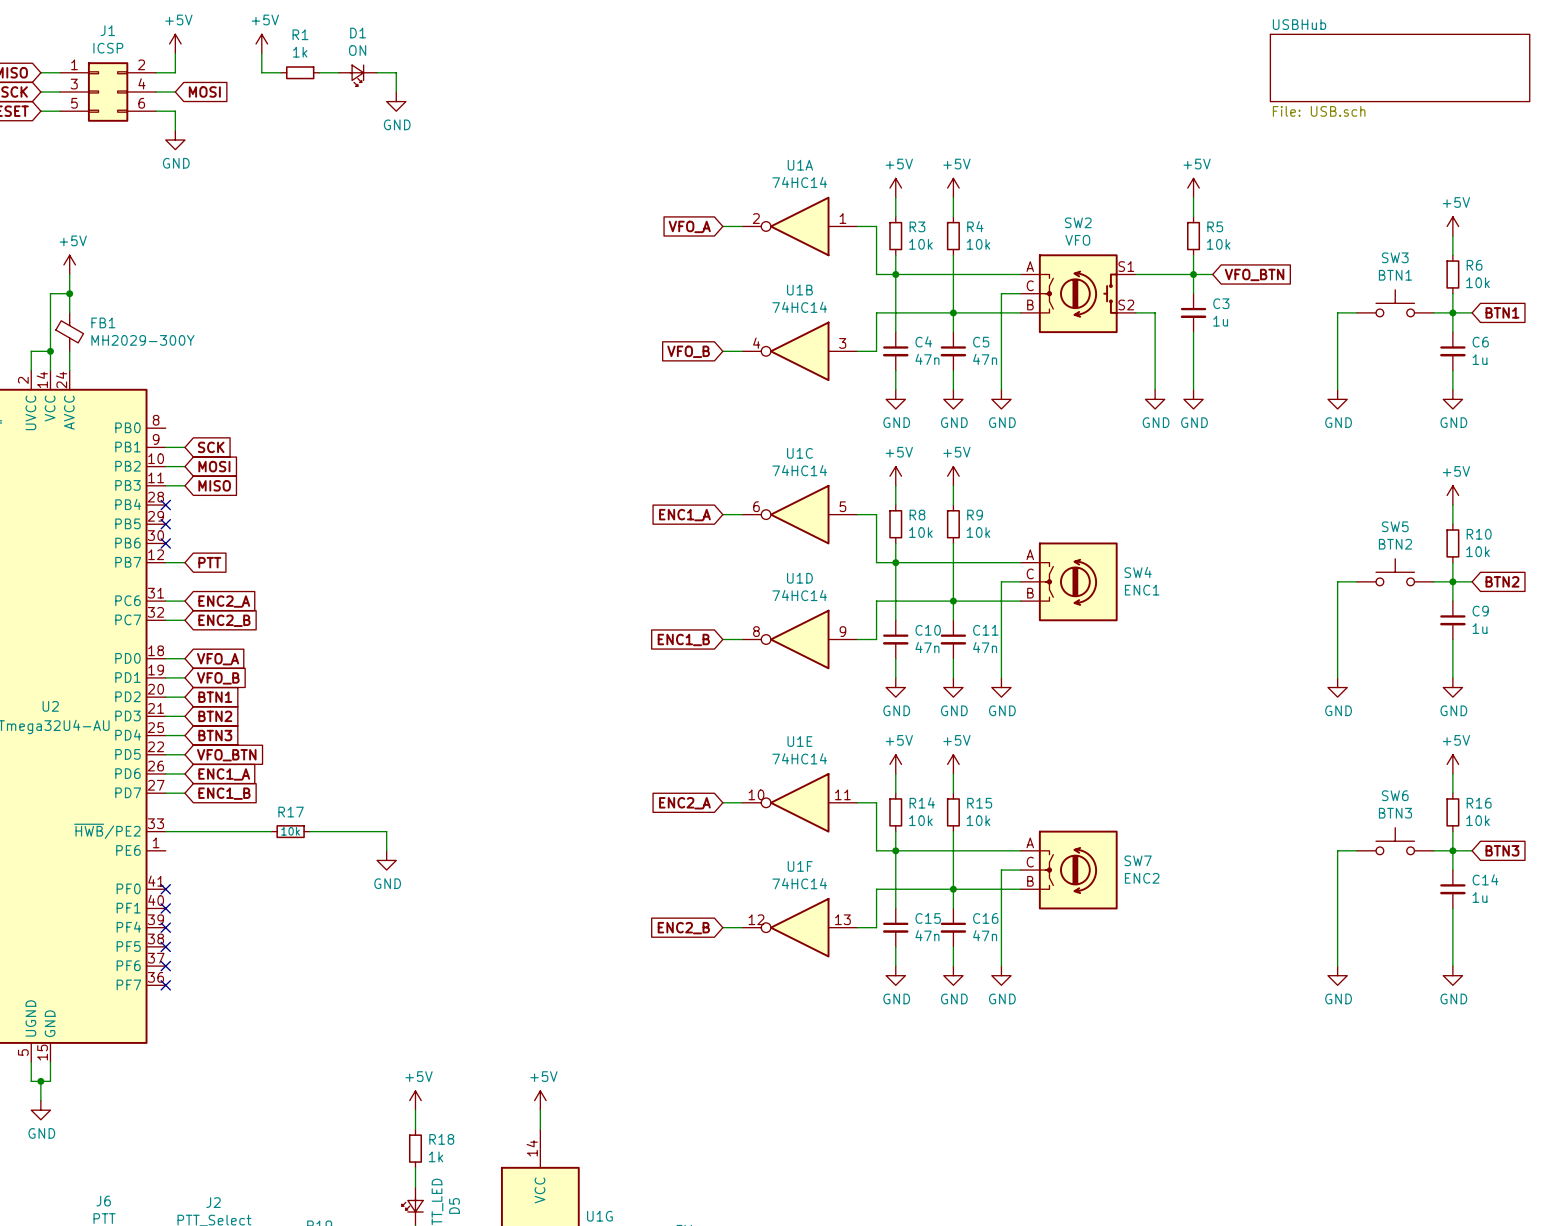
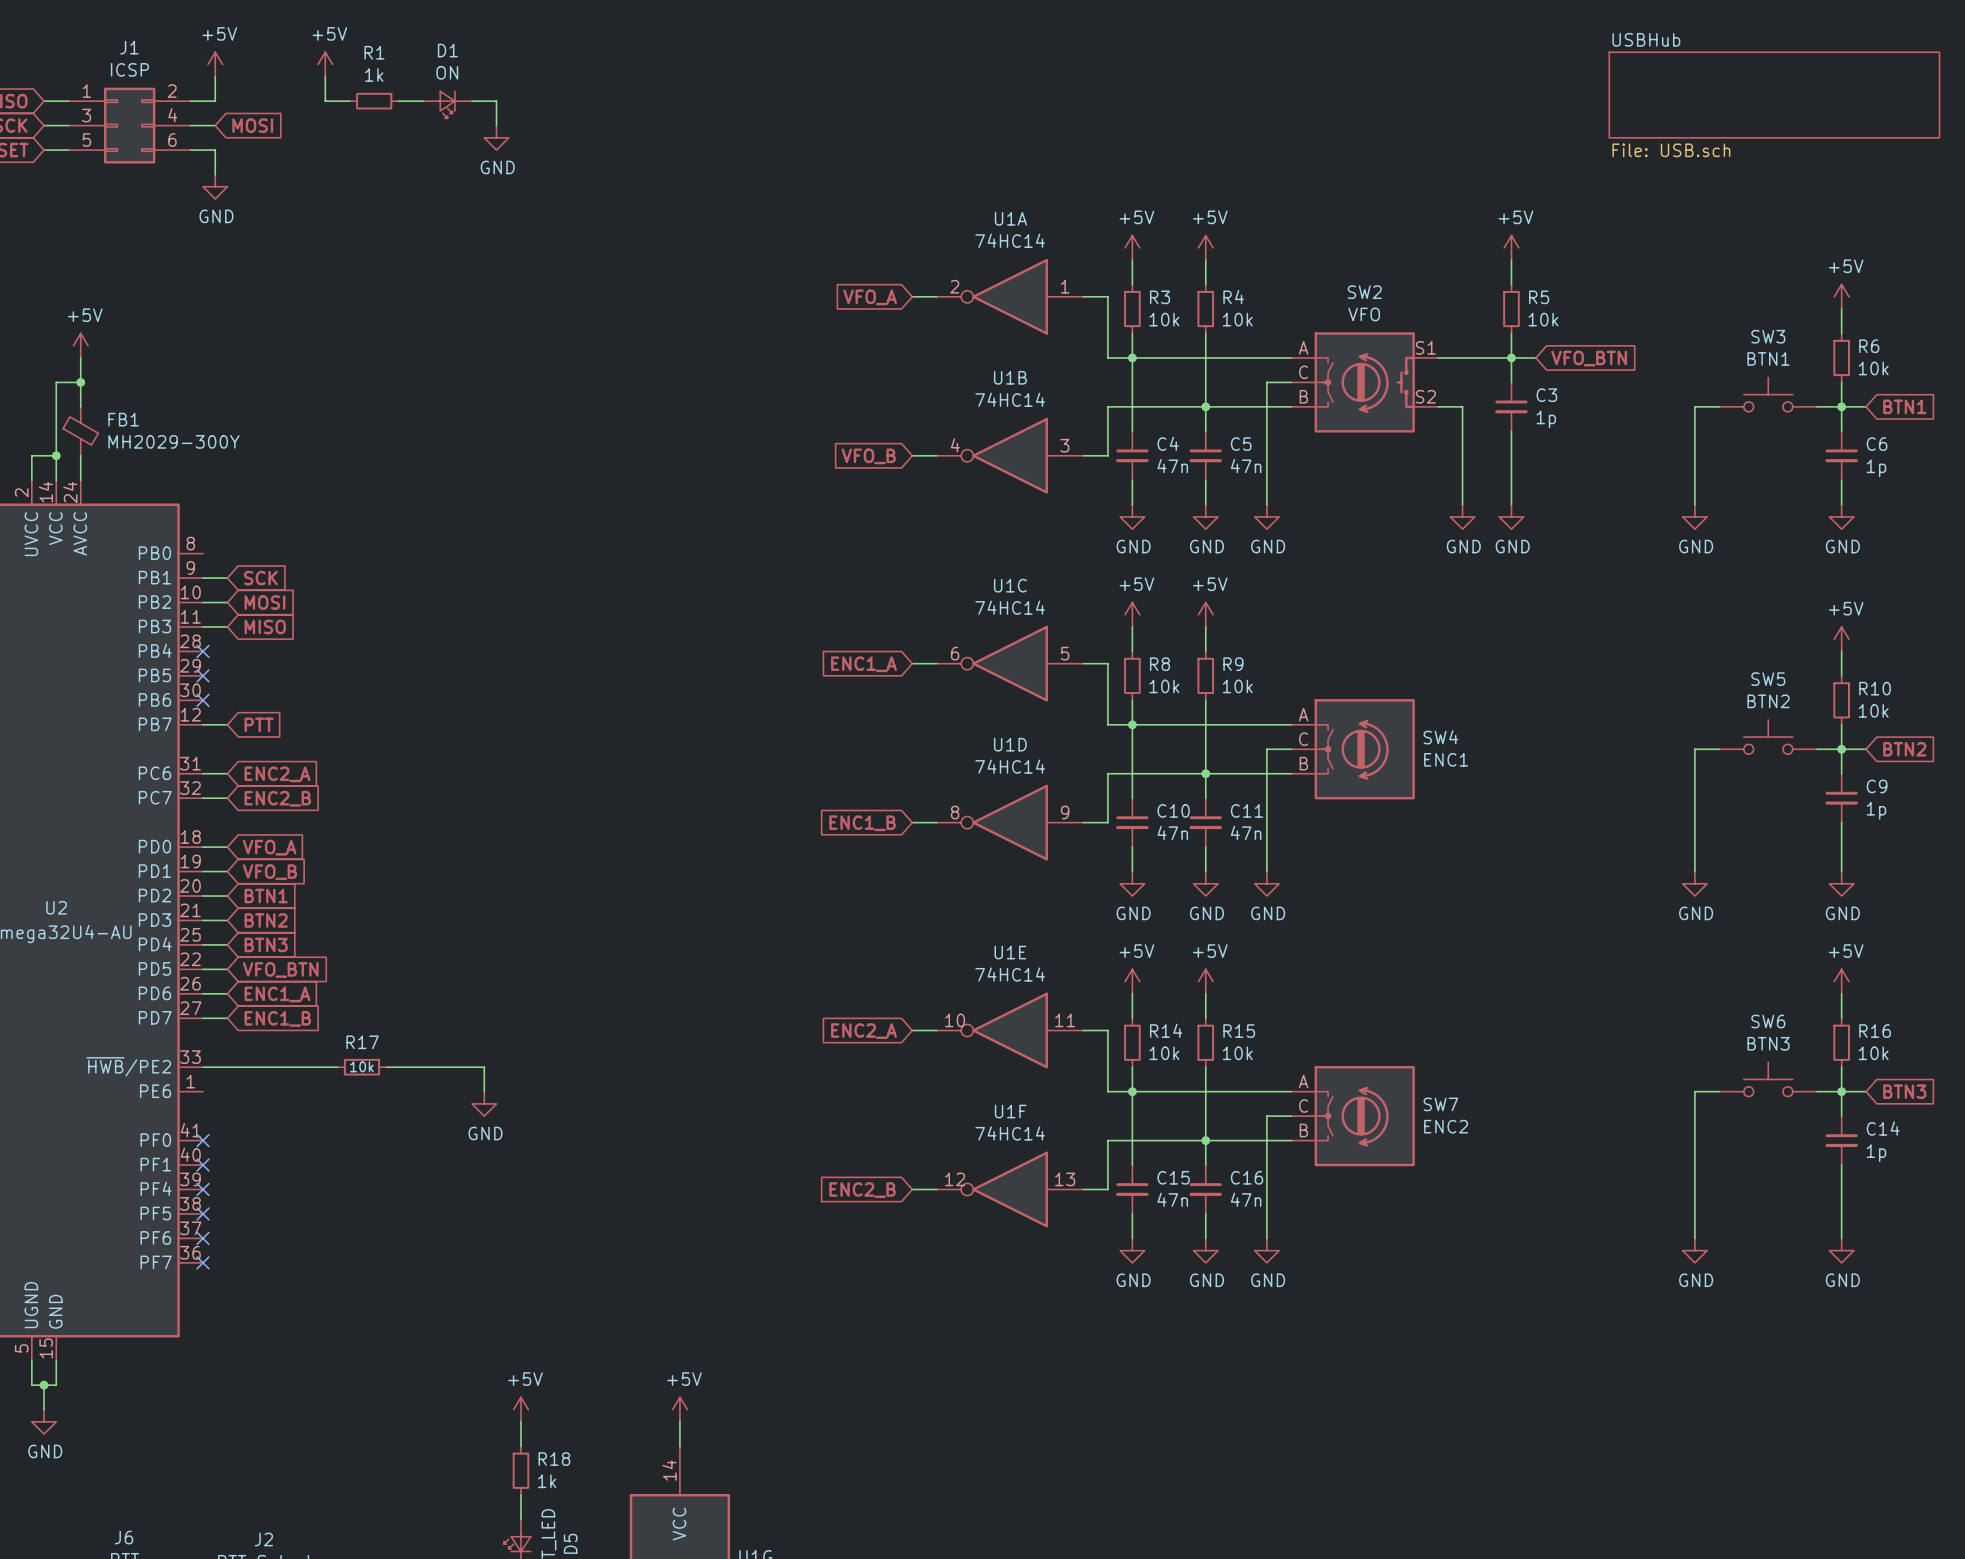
C3 value: 1u (1220, 321) -> 1p (1546, 419)
C6 value: 1u (1480, 359) -> 1p (1876, 468)
C9 value: 1u (1480, 628) -> 1p (1876, 810)
C14 value: 1u (1480, 897) -> 1p (1876, 1153)

